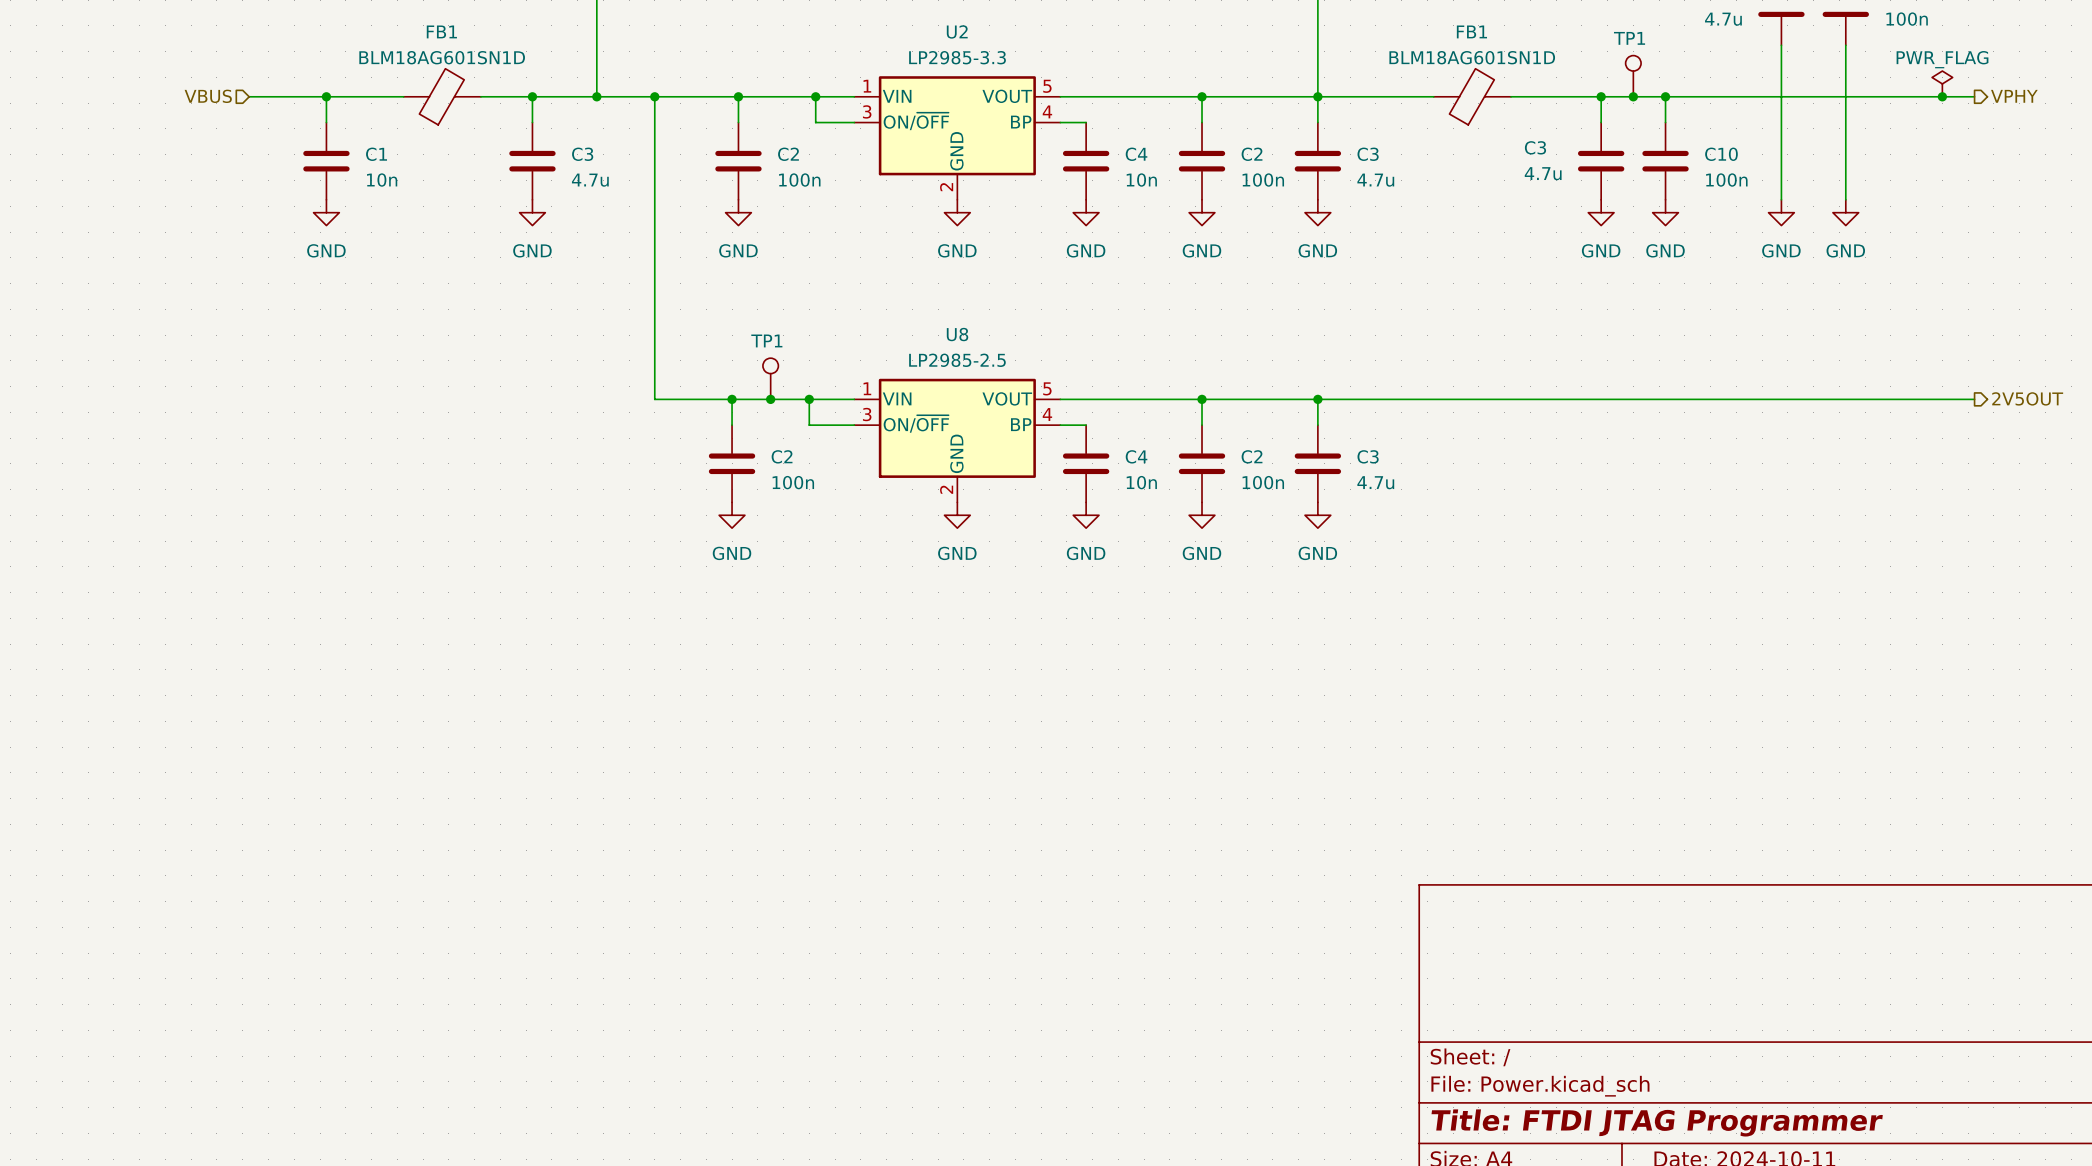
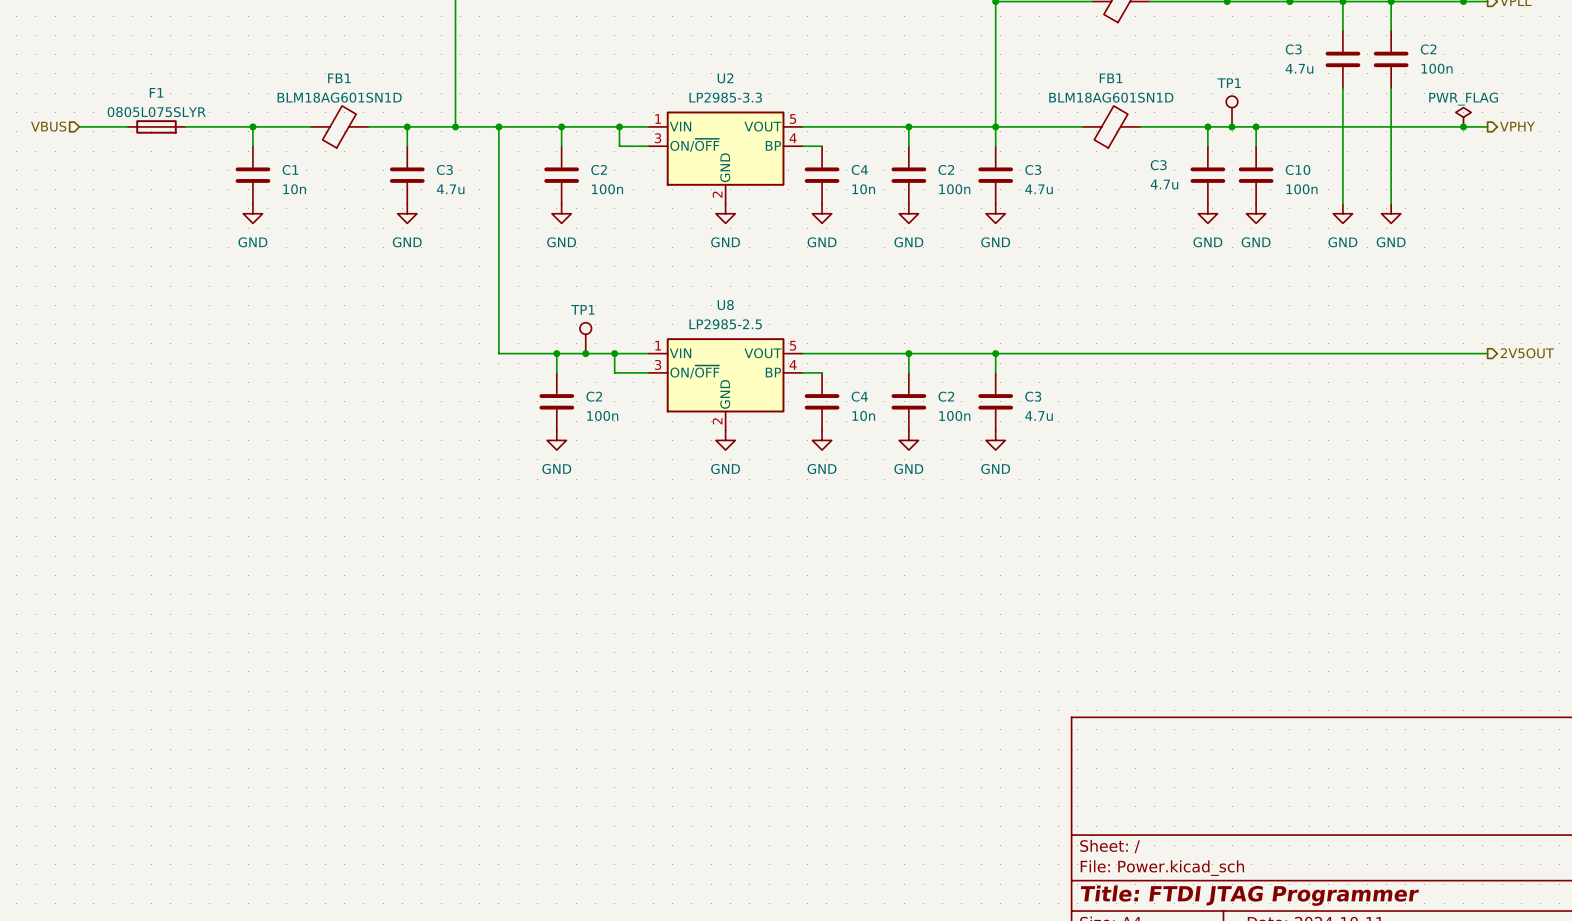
wire: none -> (79, 126) (127, 126)
F1: none -> 0805L075SLYR (156, 126)
hierarchical label position: VBUS (208, 96) -> VBUS (48, 126)
wire: none -> (185, 126) (195, 126)

